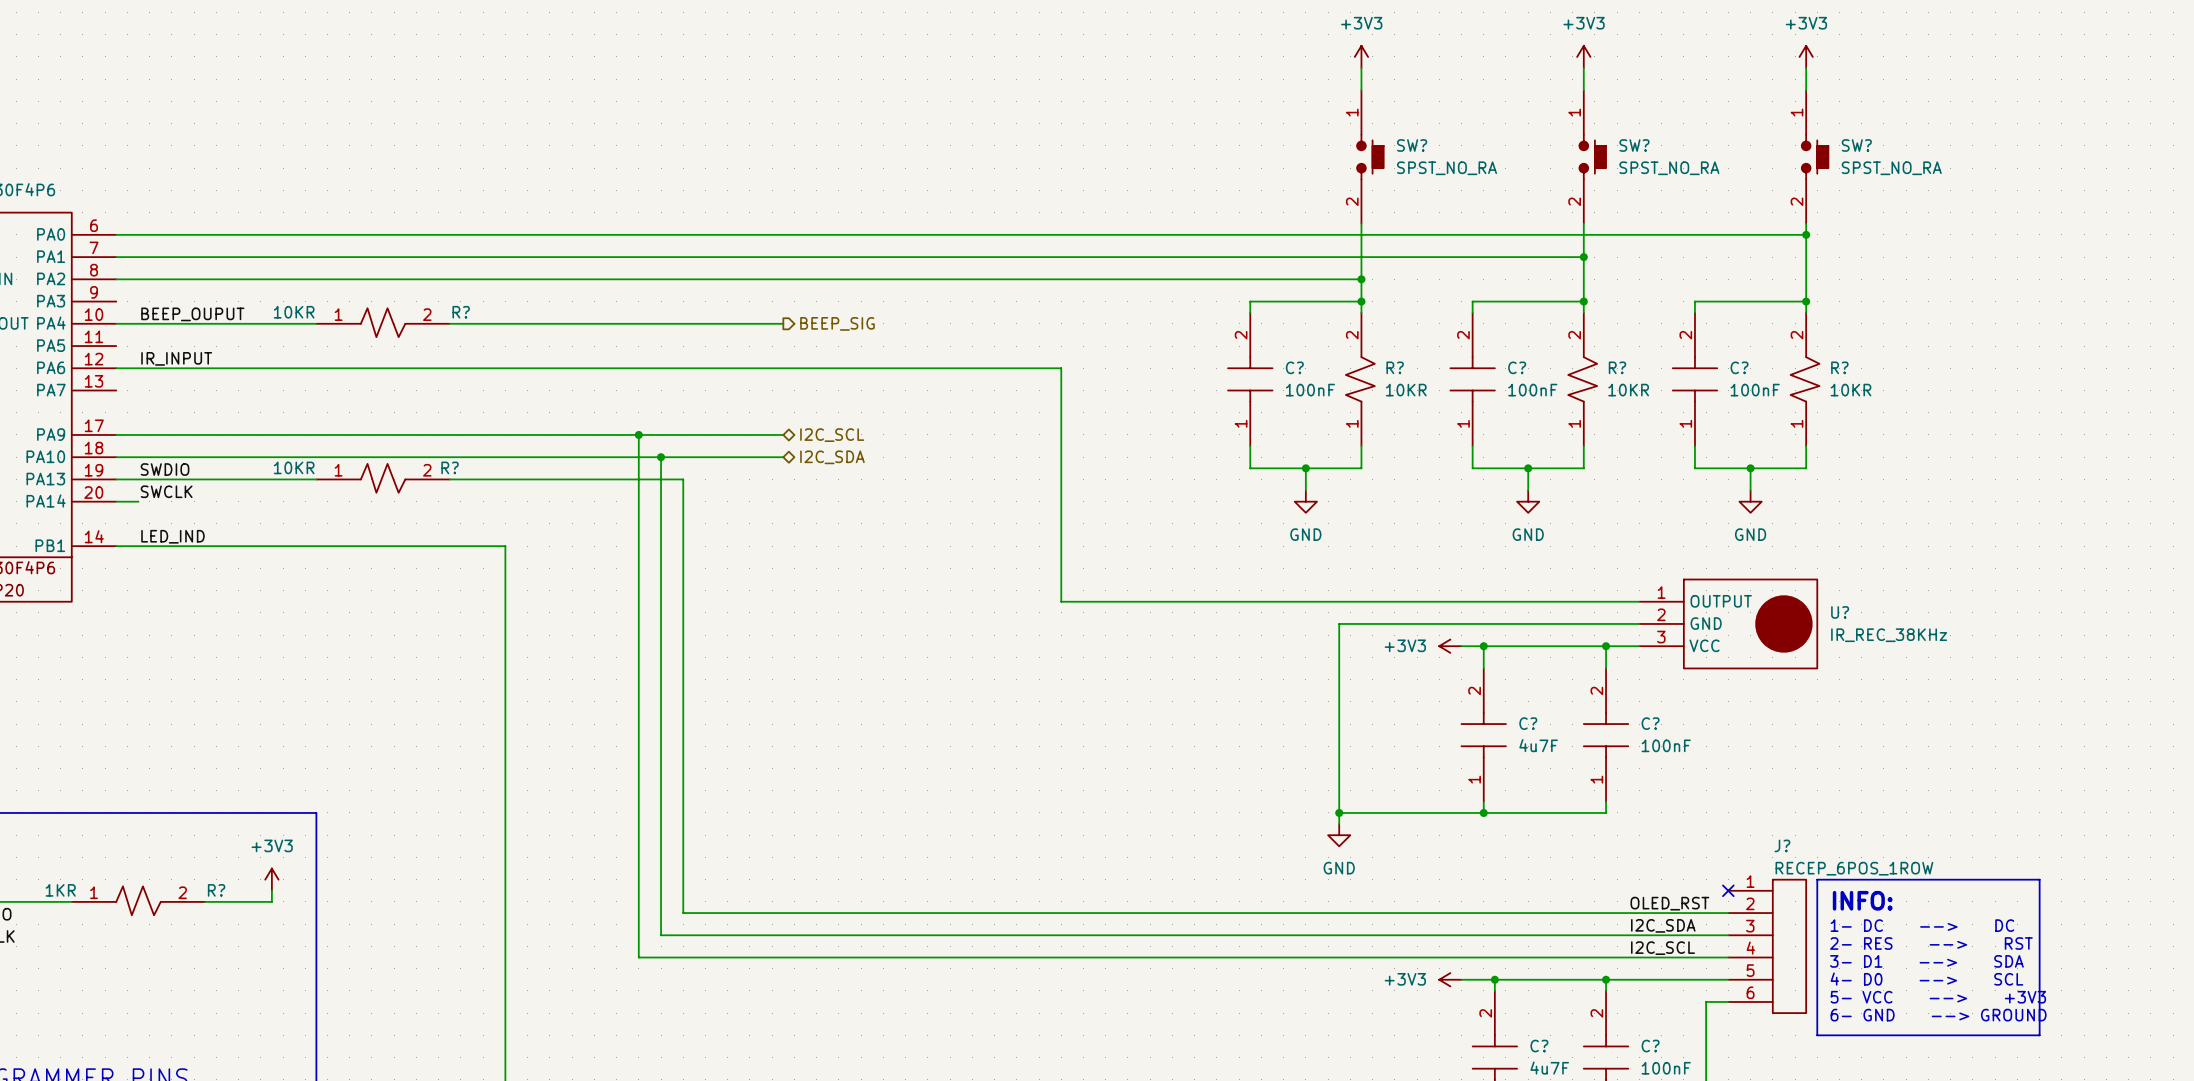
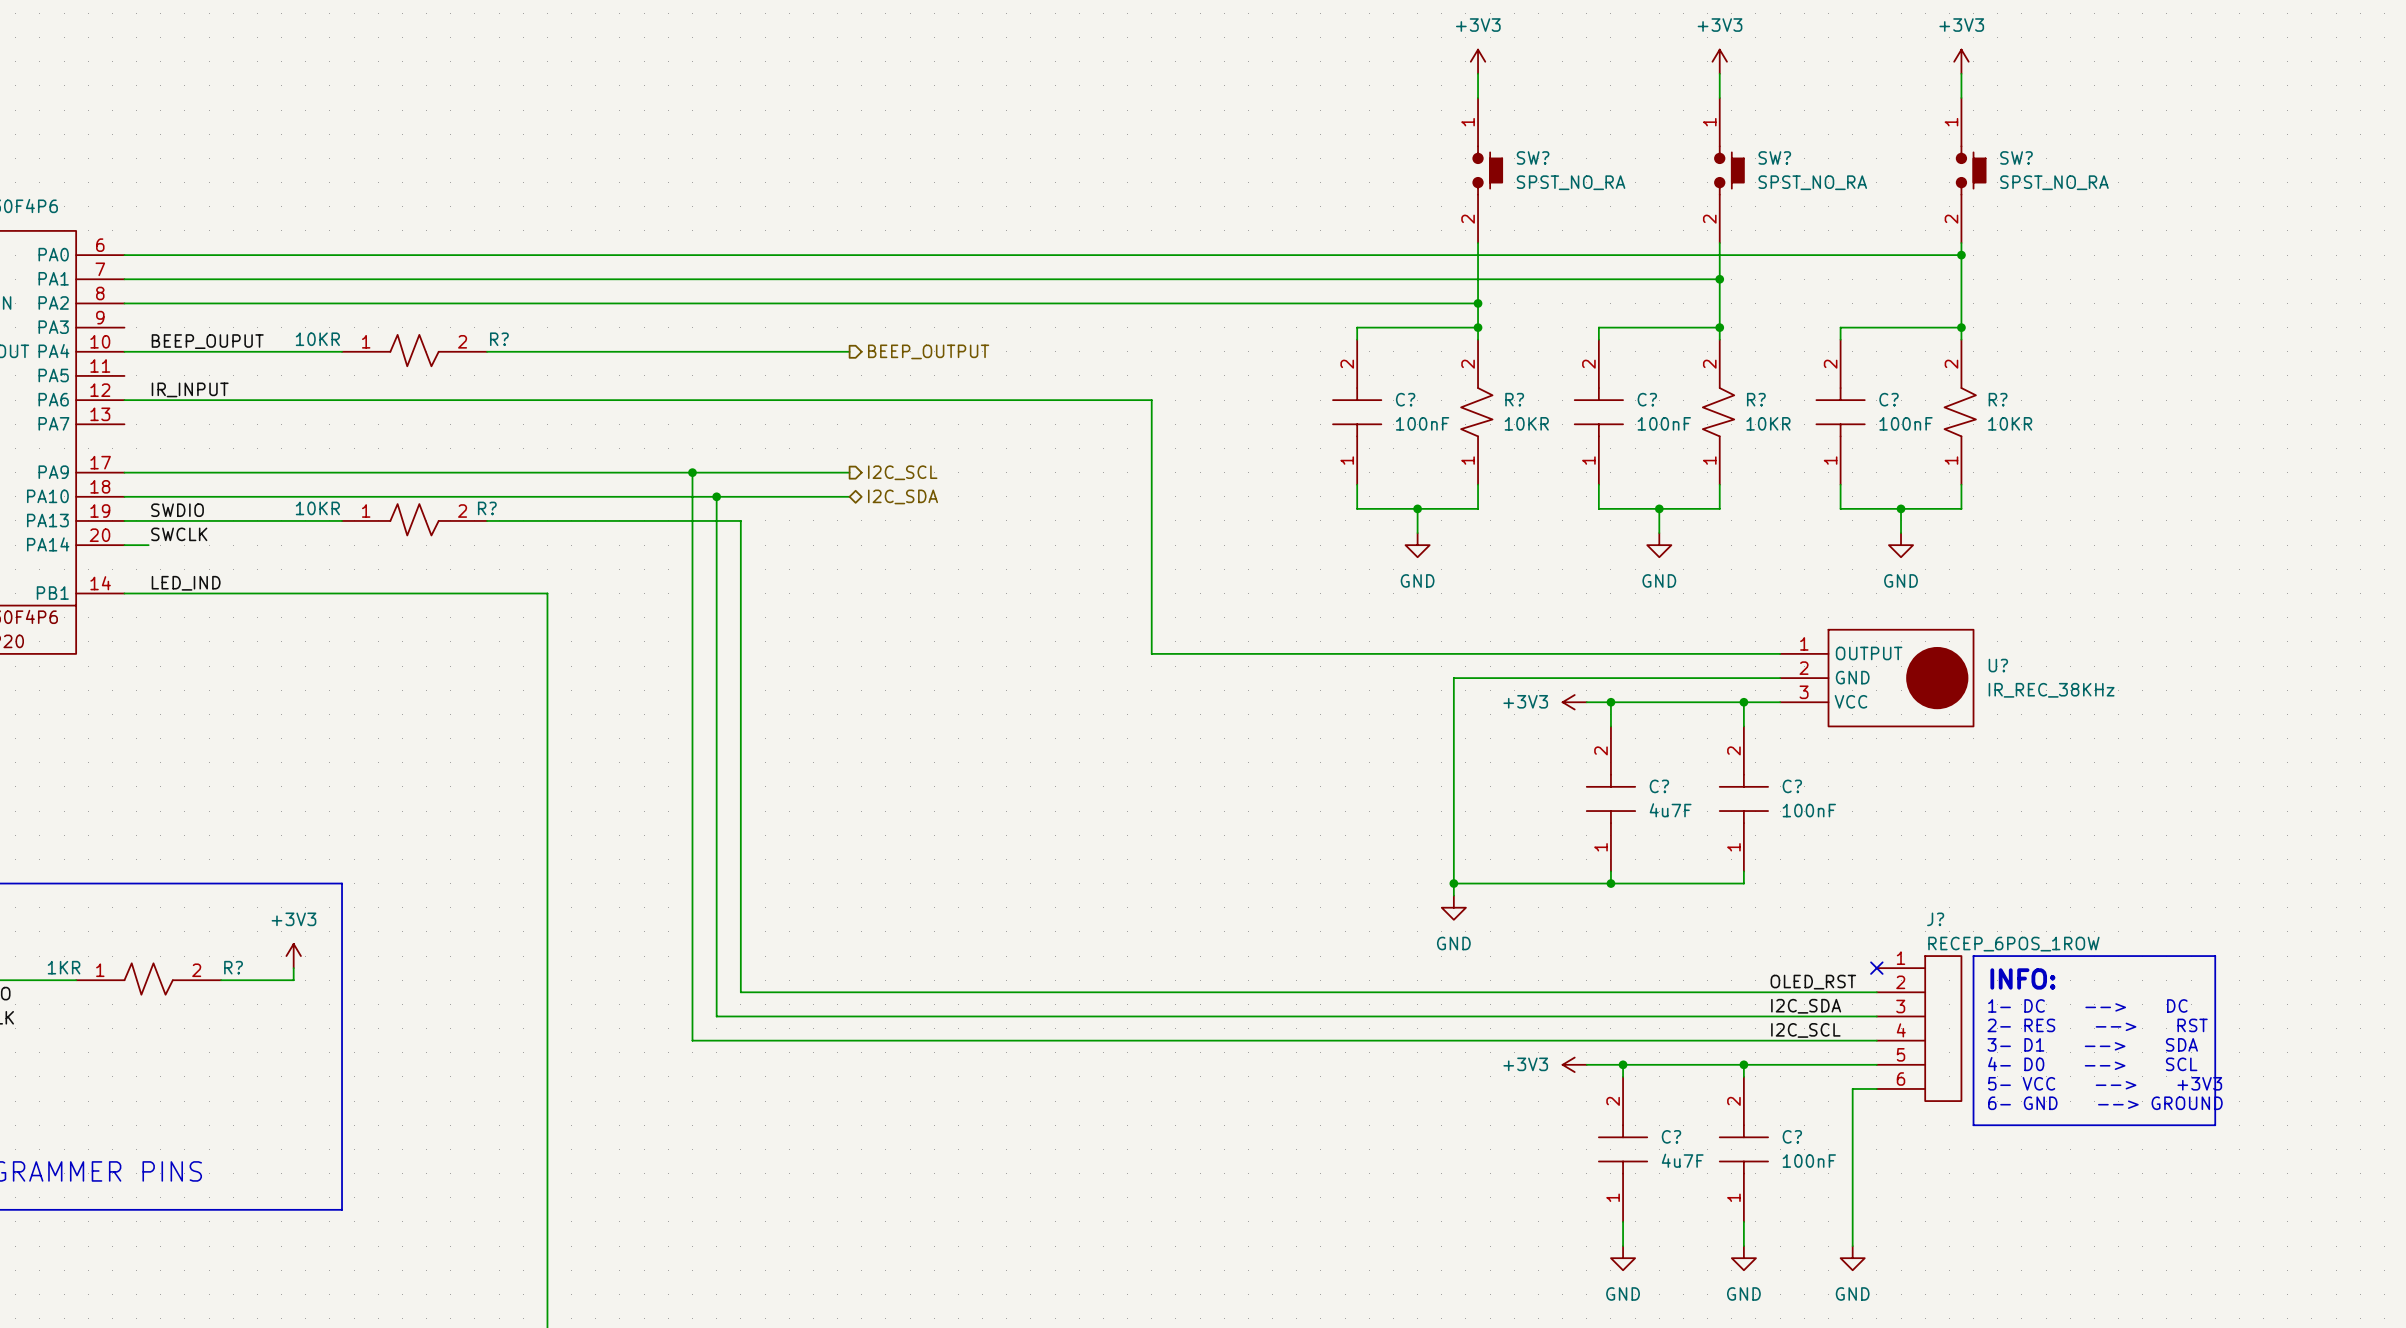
hierarchical label: BEEP_SIG (837, 323) -> BEEP_OUTPUT (928, 351)
hierarchical label shape: bidirectional (832, 435) -> output (902, 472)

